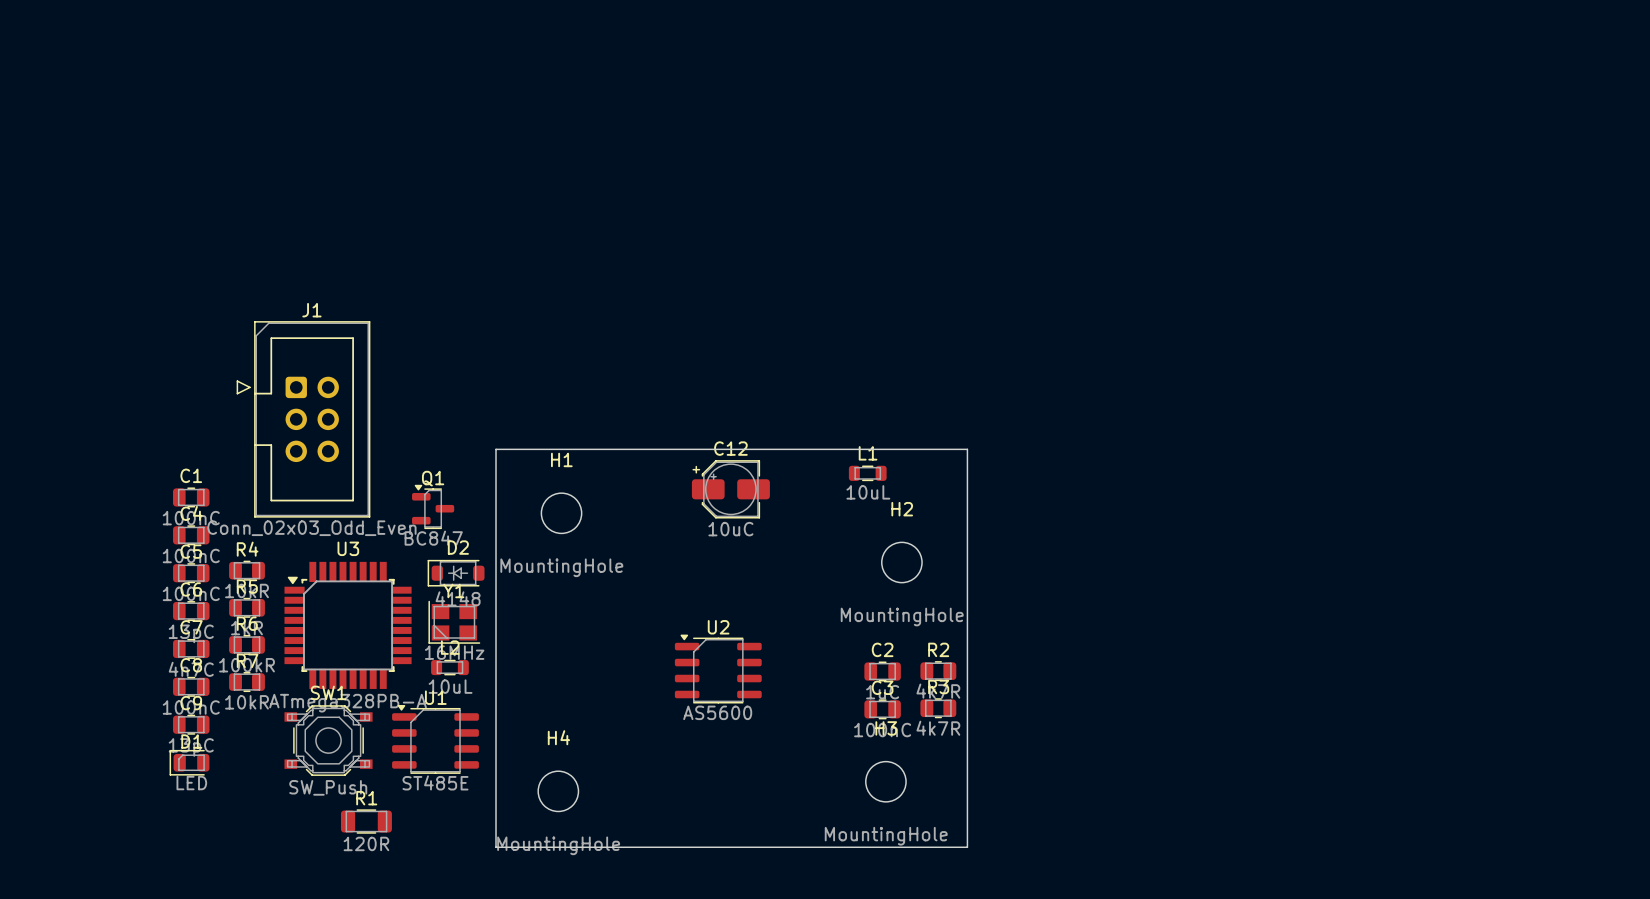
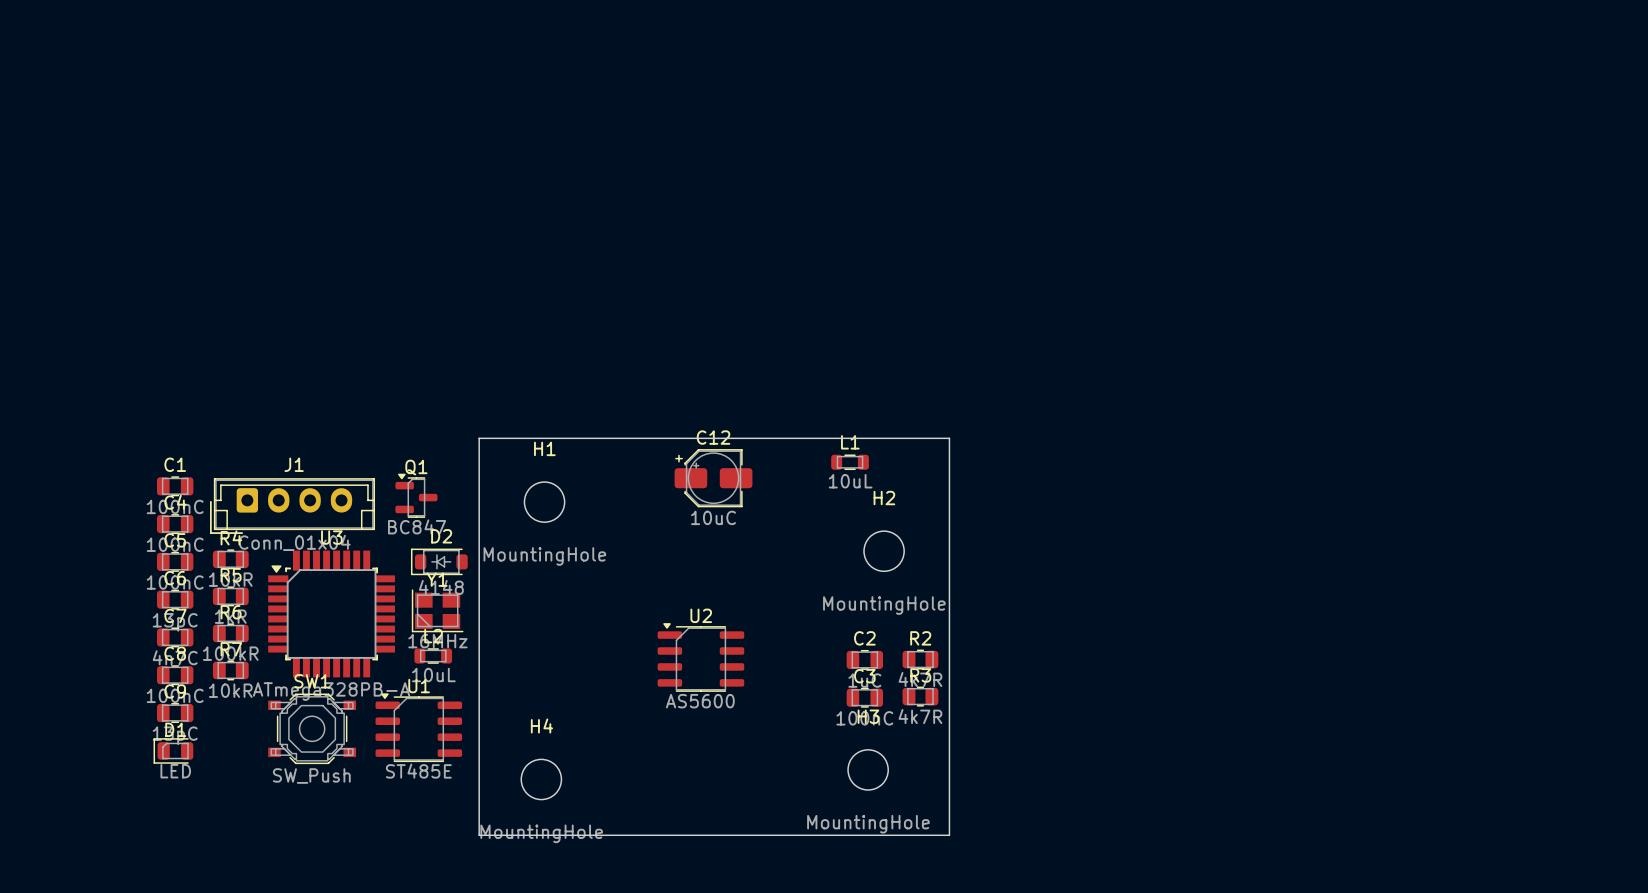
J1 name position: J1 (311, 310) -> J1 (294, 464)
J1 footprint: [236, 321, 371, 518] -> [210, 478, 376, 534]
J1 value: Conn_02x03_Odd_Even (311, 528) -> Conn_01x04 (294, 542)
R1: 120R (366, 821) -> none

